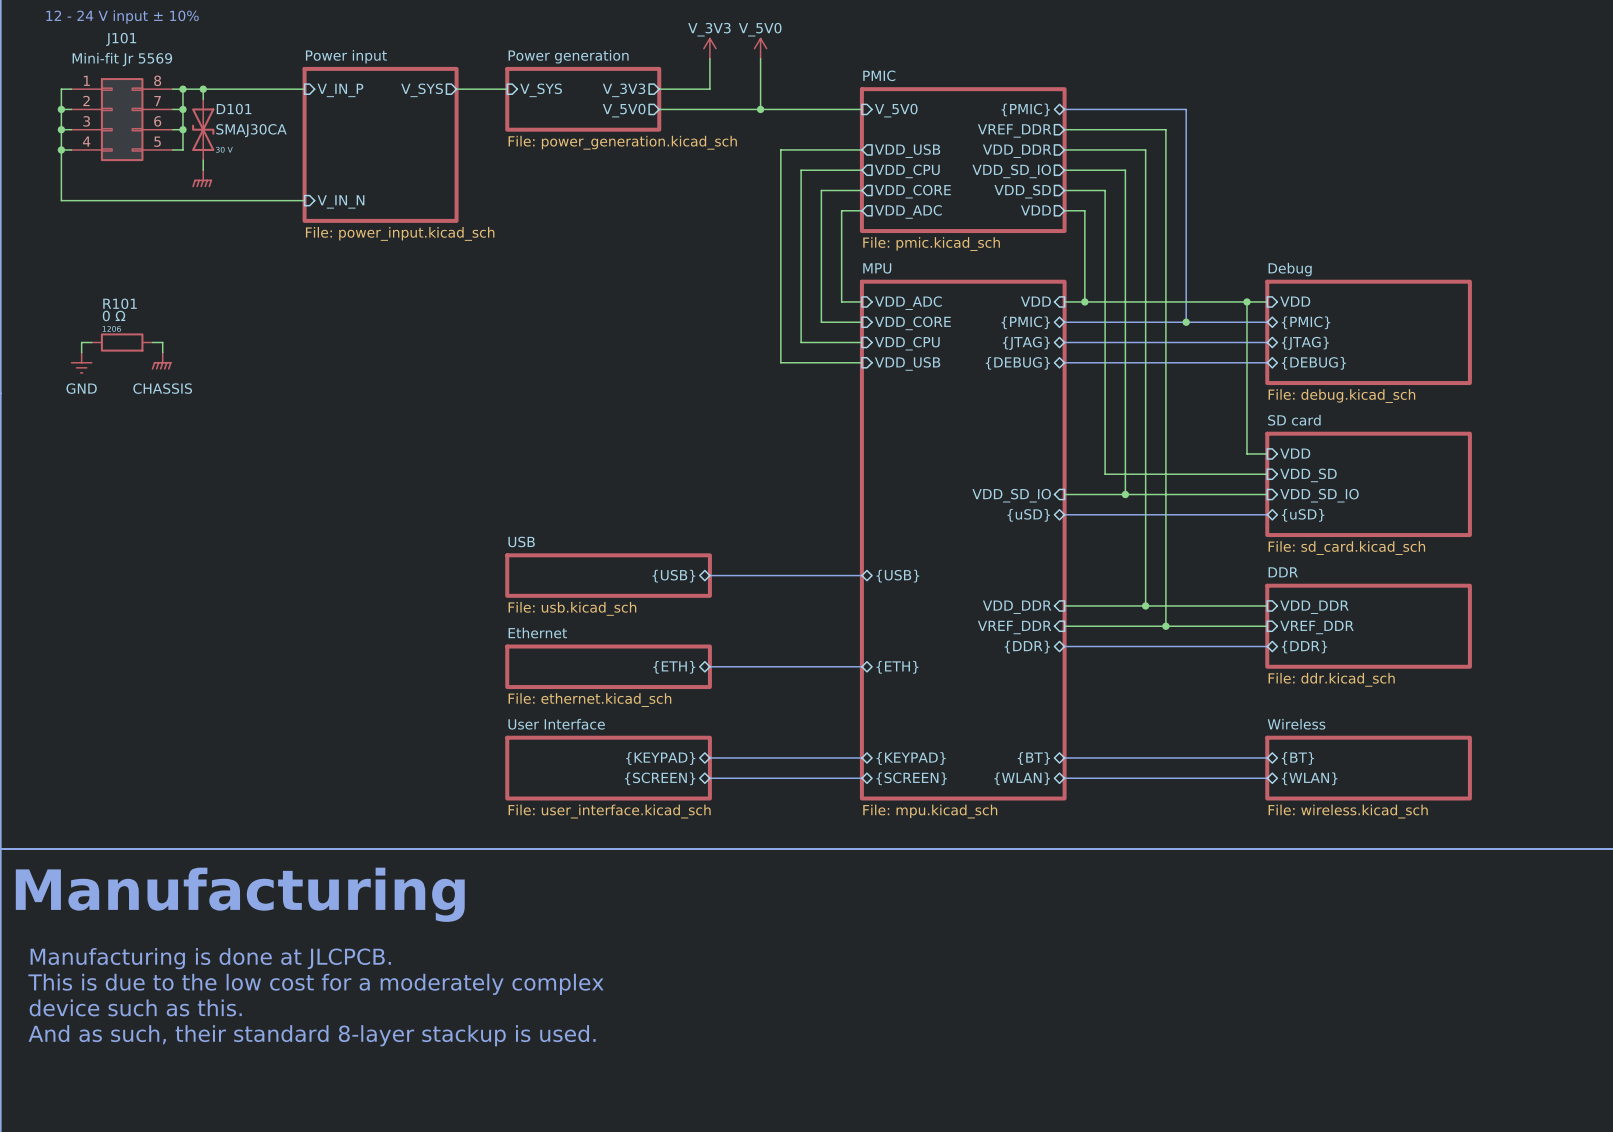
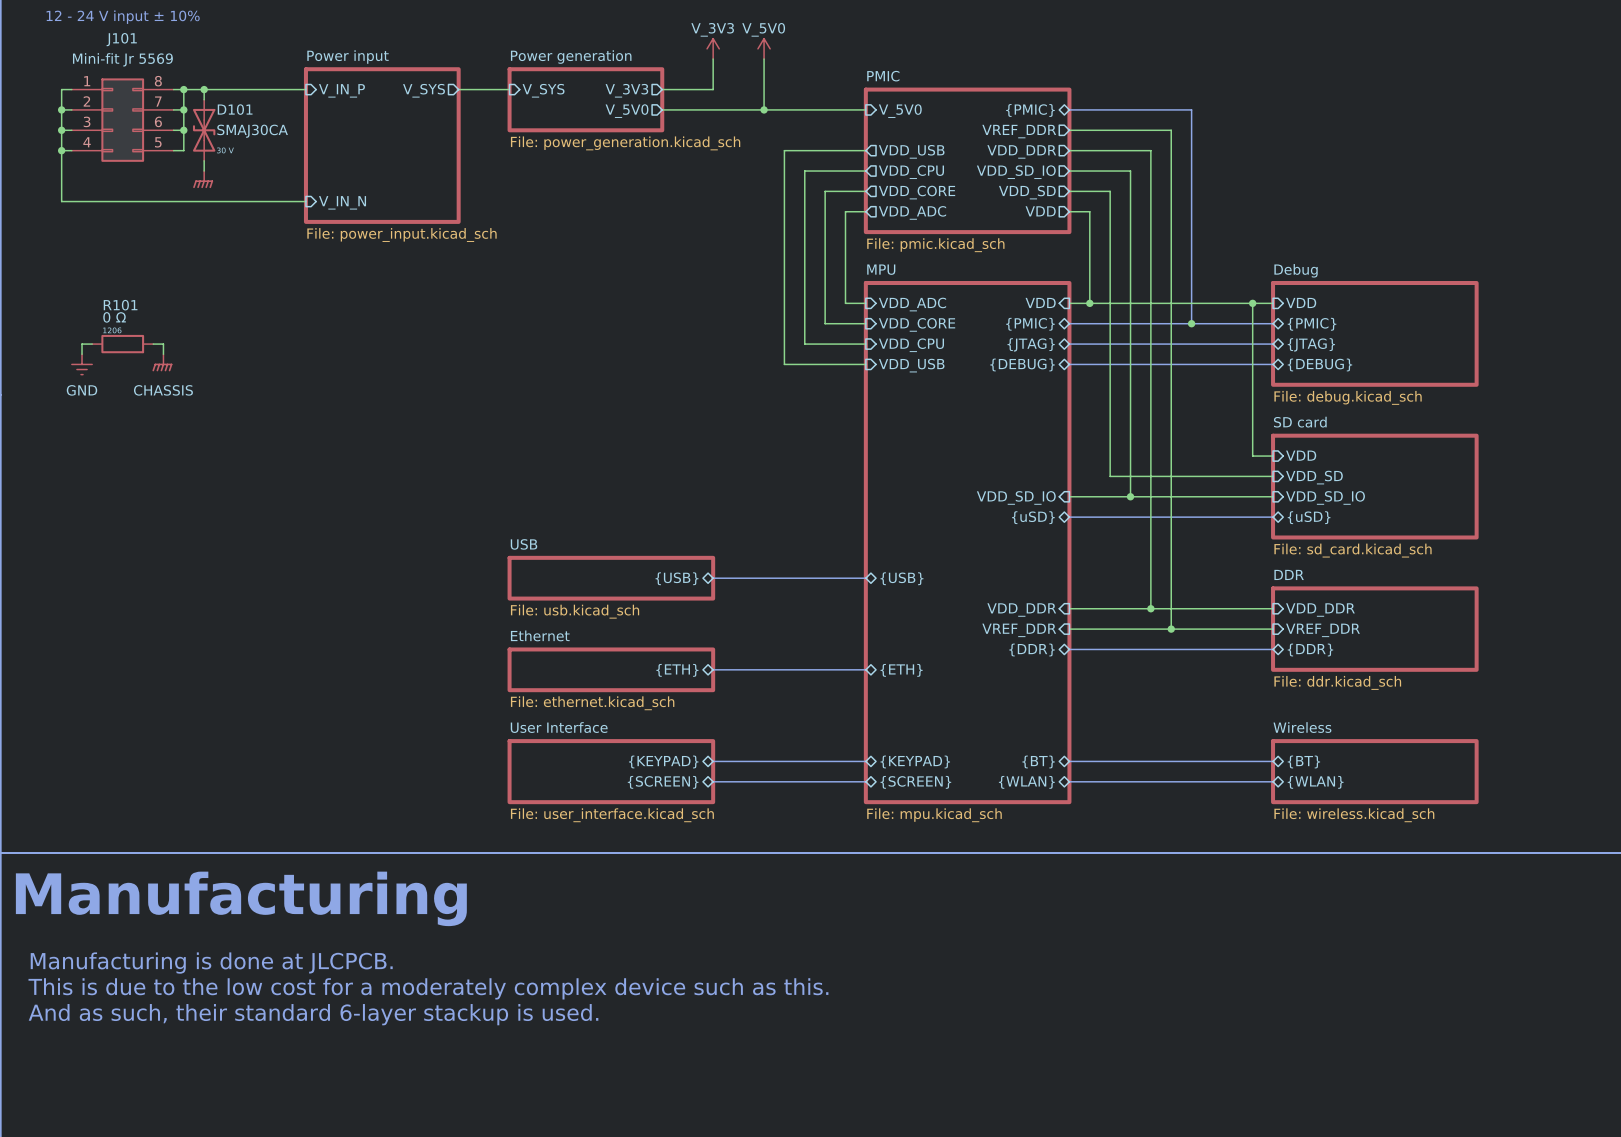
text: This is due to the low cost for a moderately complex (316, 984) -> This is due to the low cost for a moderately complex device such as this. (428, 988)
text: device such as this. (135, 1007) -> And as such, their standard 6-layer stackup is used. (313, 1014)
text: And as such, their standard 8-layer stackup is used. (312, 1035) -> none

